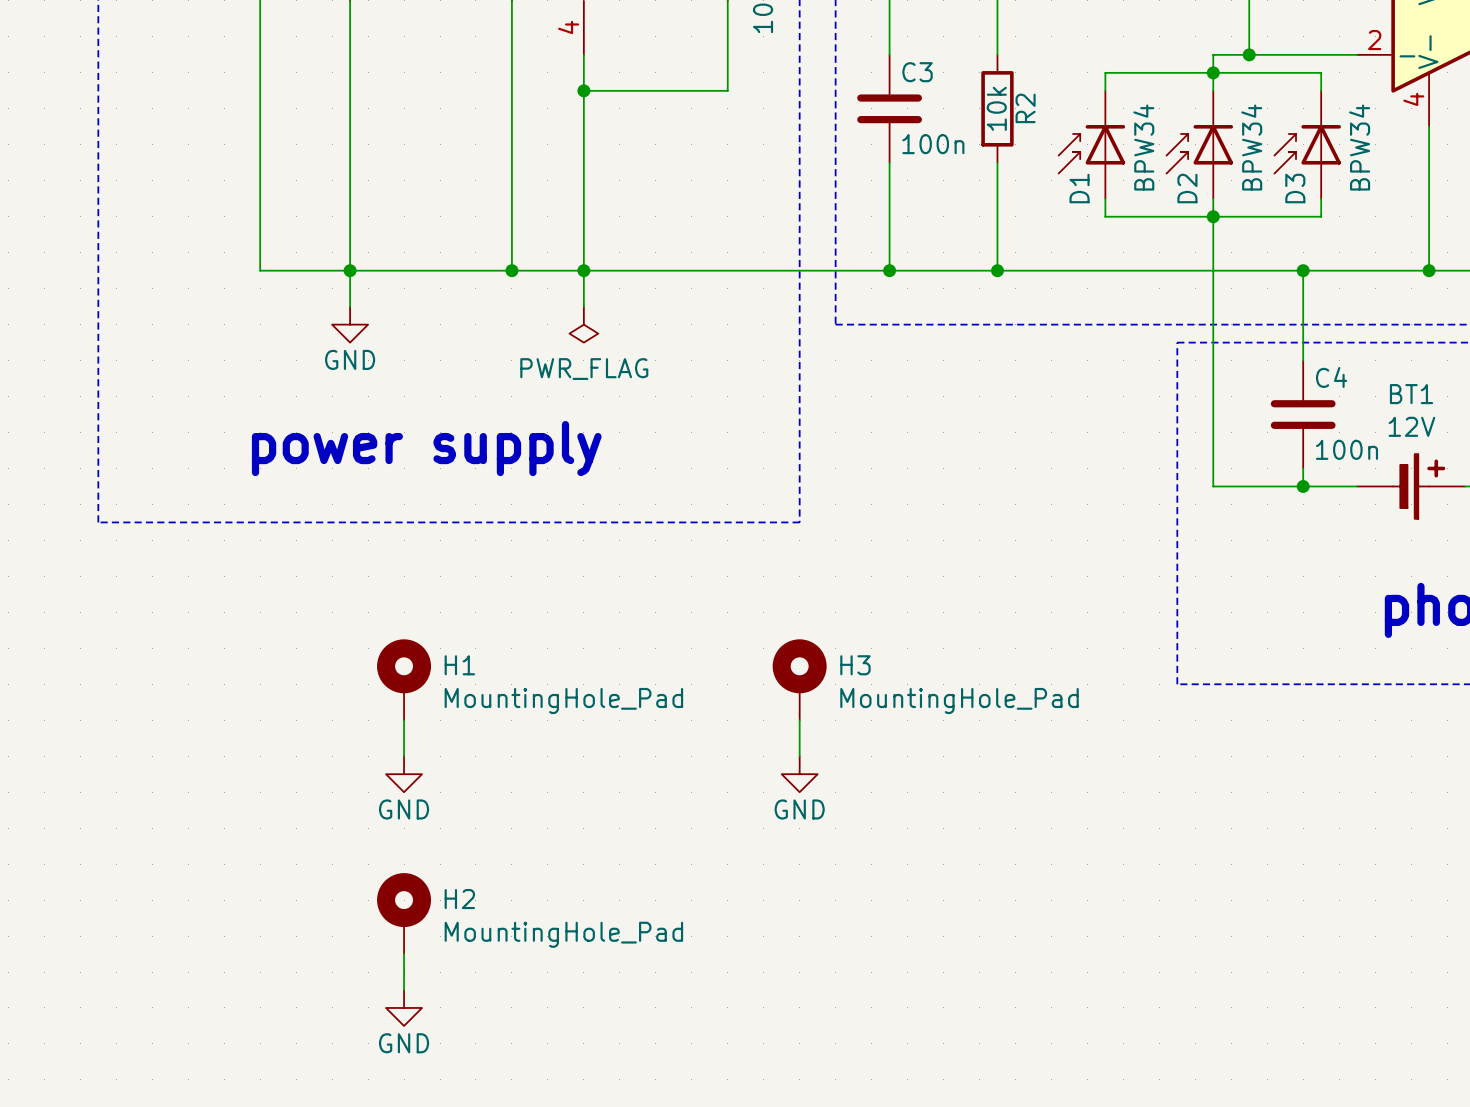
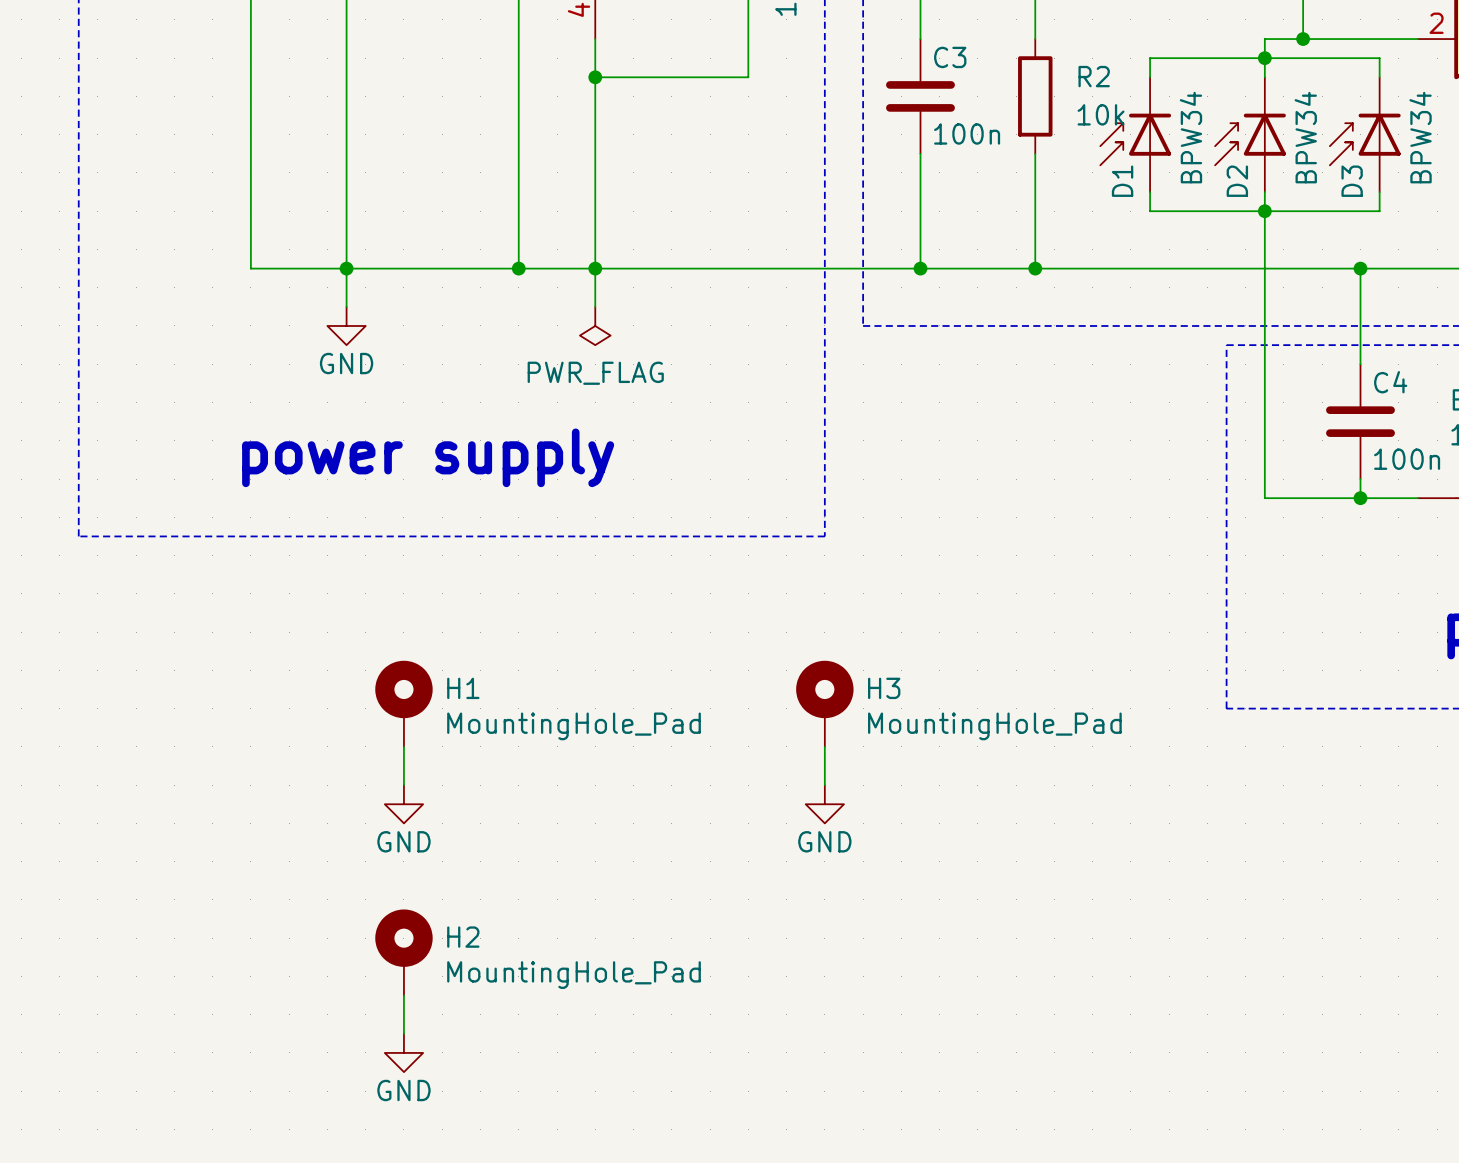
R2 value rotation: 0° (996, 108) -> 90° clockwise (1101, 114)
R2 value position: 10k (996, 108) -> 10k (1101, 114)
R2 name rotation: 0° (1025, 108) -> 90° clockwise (1094, 76)

